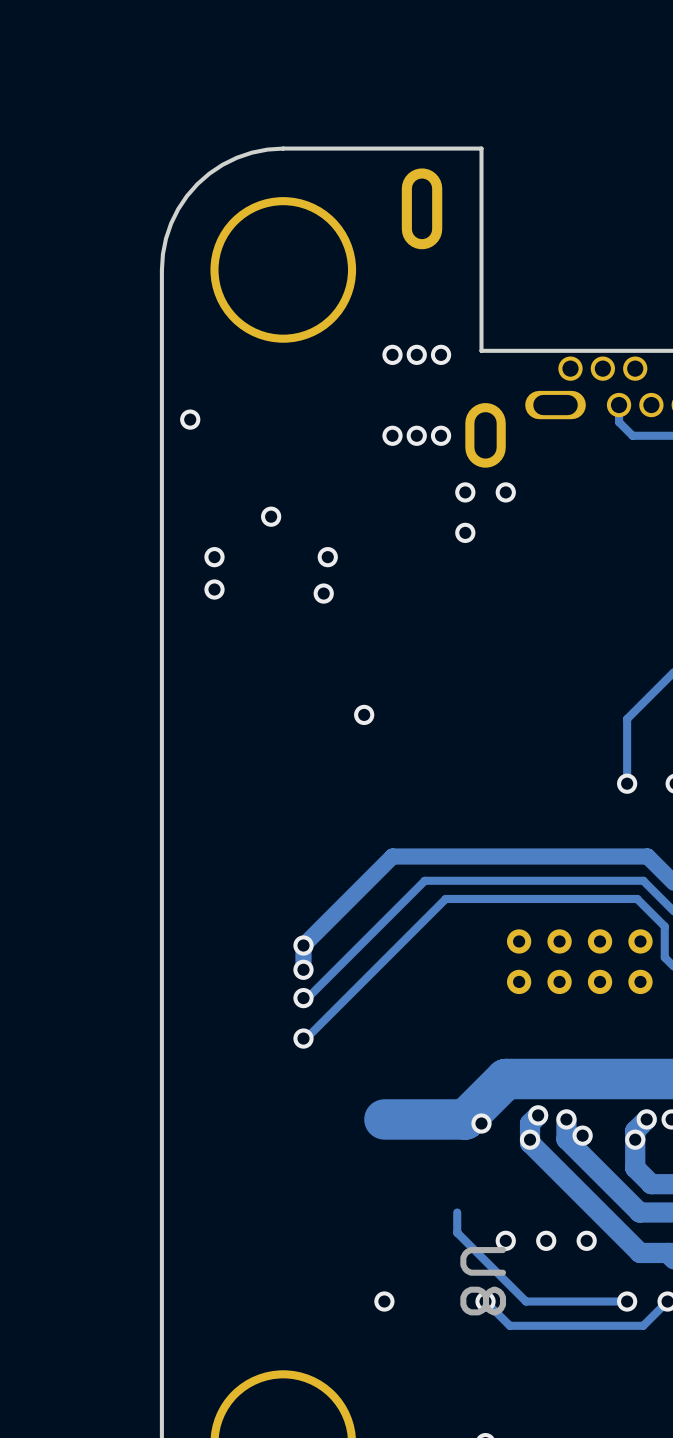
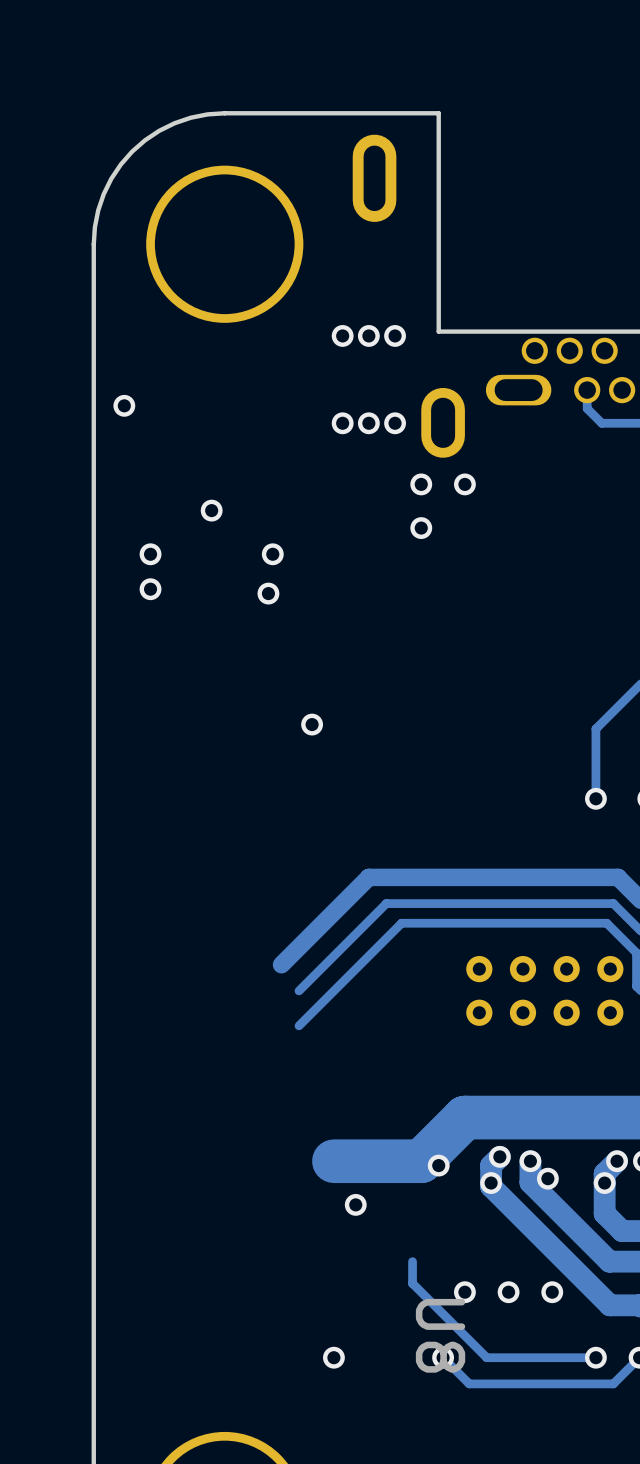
track: (416, 856) (392, 856) (303, 945) (303, 969) -> (368, 877) (281, 964)
track: (432, 880) (424, 880) (307, 998) (303, 998) -> (386, 903) (299, 990)
track: (447, 898) (306, 1038) (303, 1038) -> (401, 923) (299, 1025)
via: (303, 945) -> none
via: (303, 969) -> none
via: (303, 998) -> none
via: (303, 1038) -> none
via: none -> (355, 1204)

